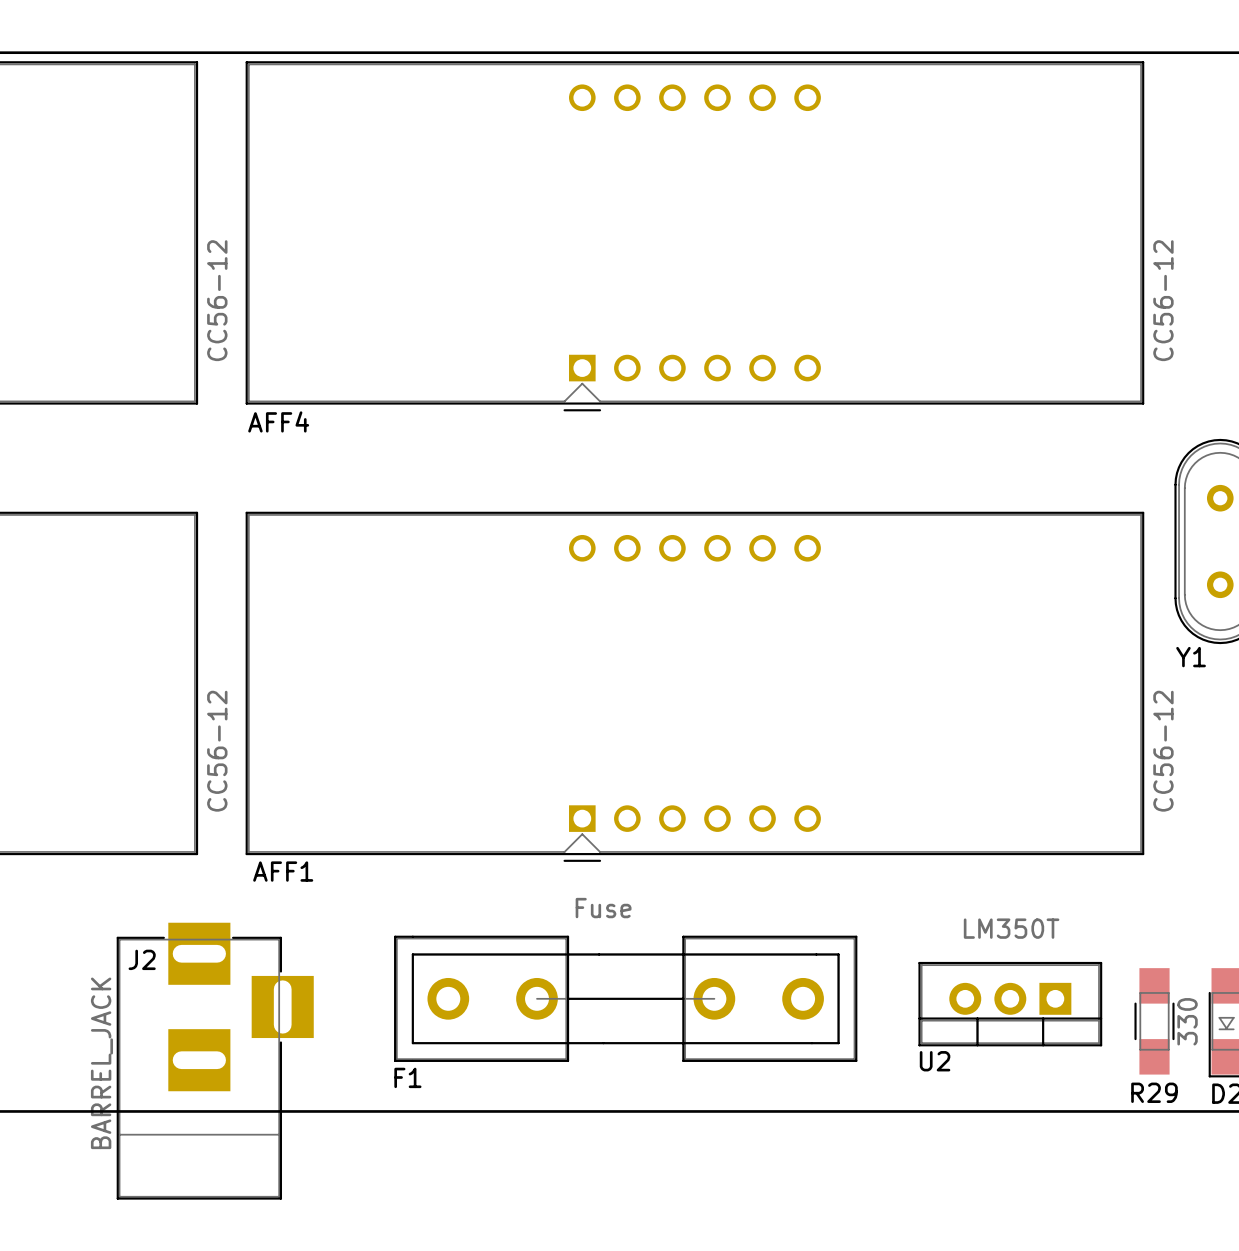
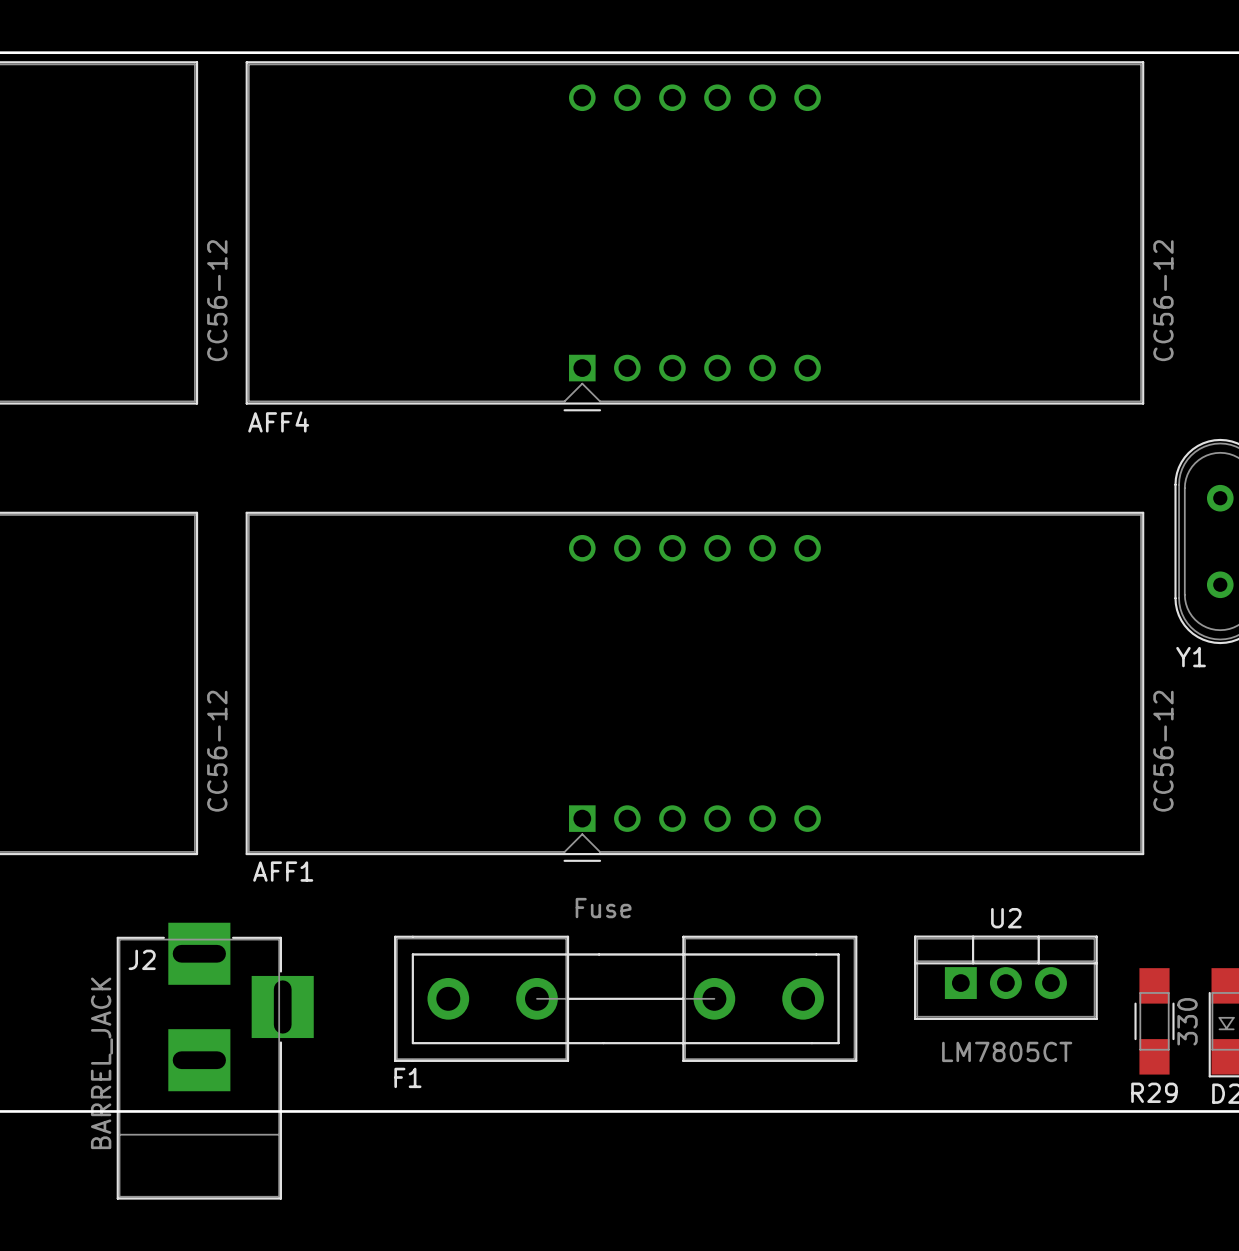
U2 value: LM350T (1011, 928) -> LM7805CT (1007, 1051)
U2 rotation: 0° (1010, 1004) -> 180° (1005, 977)
U2 name position: U2 (935, 1061) -> U2 (1006, 918)

